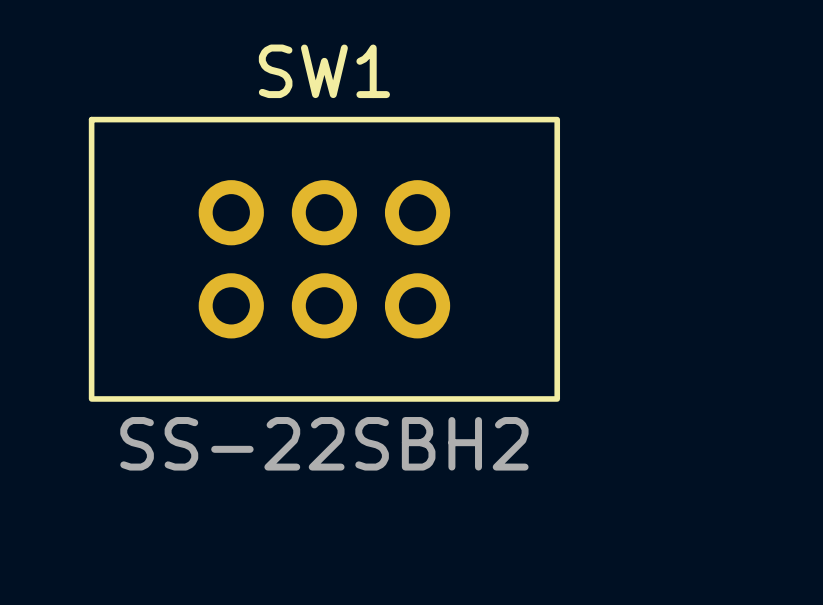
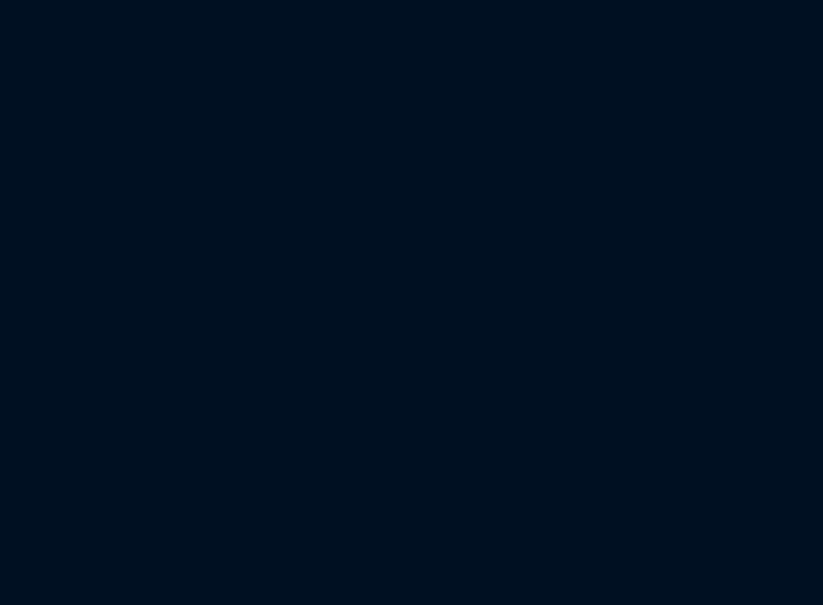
SW1: SS-22SBH2 (324, 259) -> none

